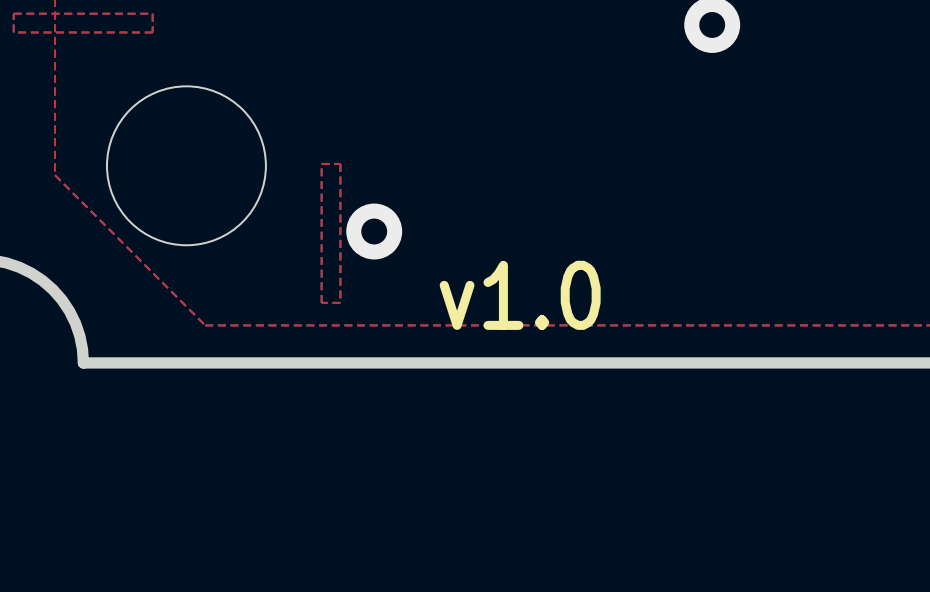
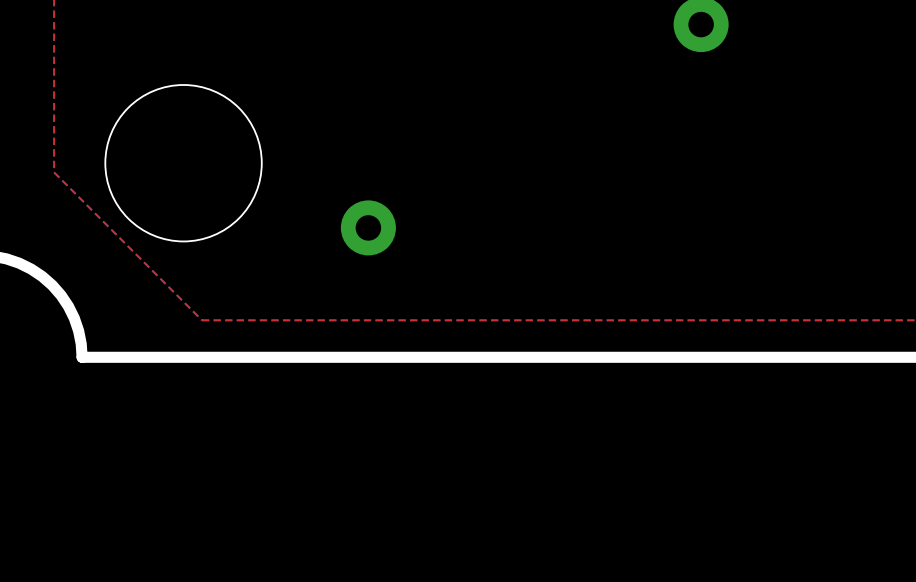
top zone outline: (13, 13) (13, 32) (152, 32) (152, 13) (13, 13) -> none
top zone outline: (321, 163) (321, 302) (340, 302) (340, 163) (321, 163) -> none
text: v1.0 (520, 295) -> none

